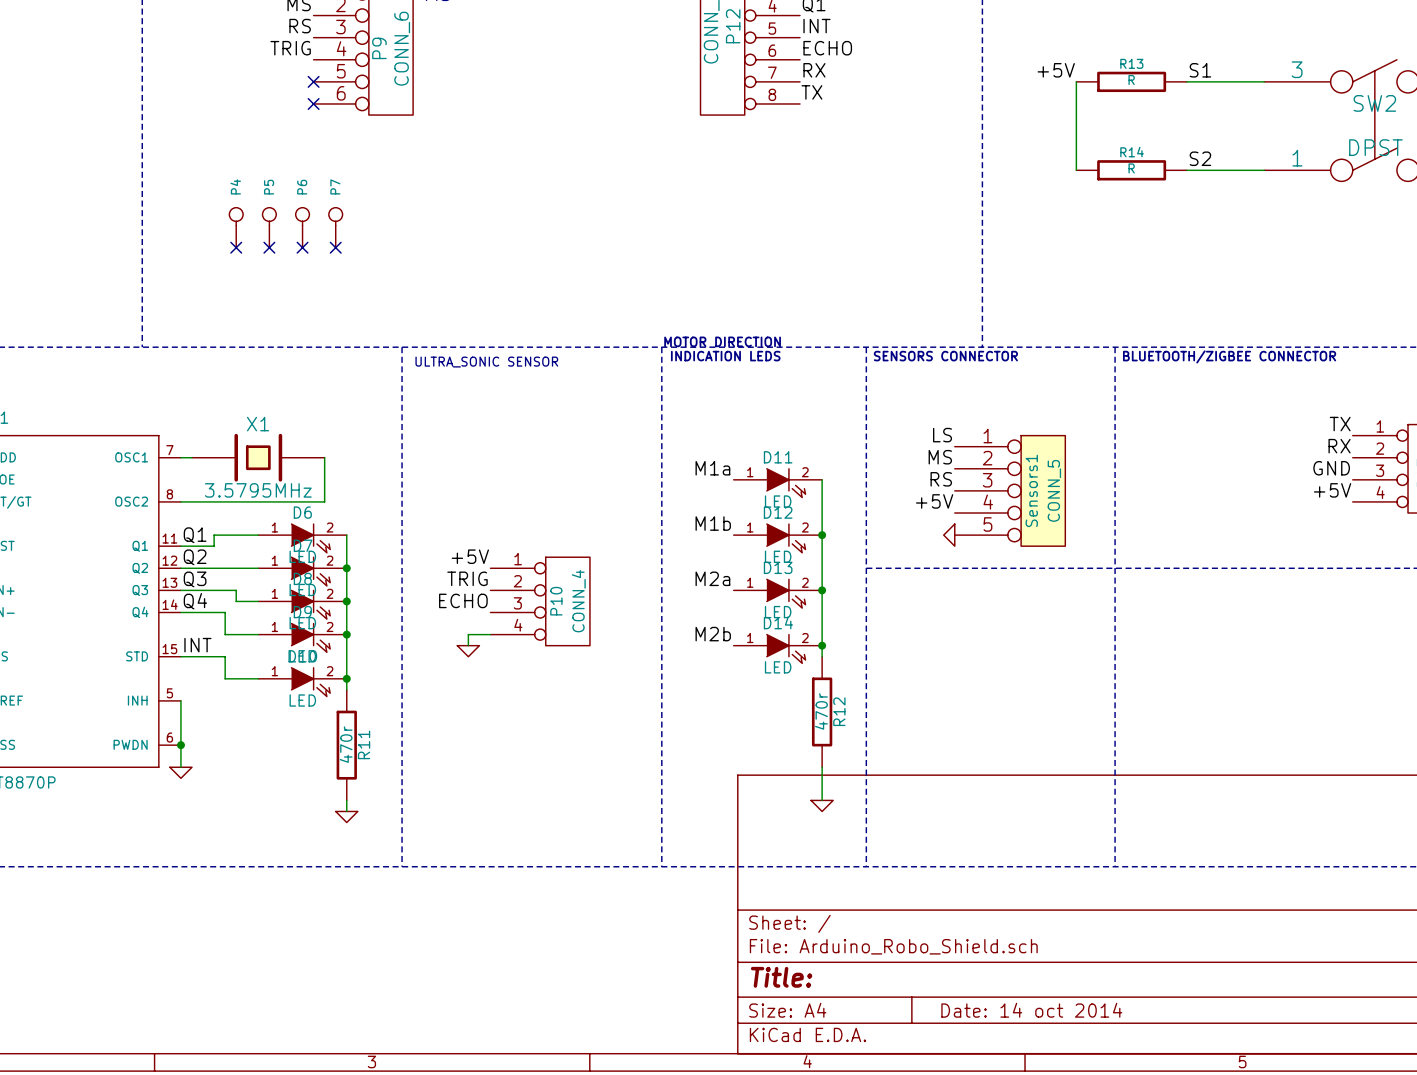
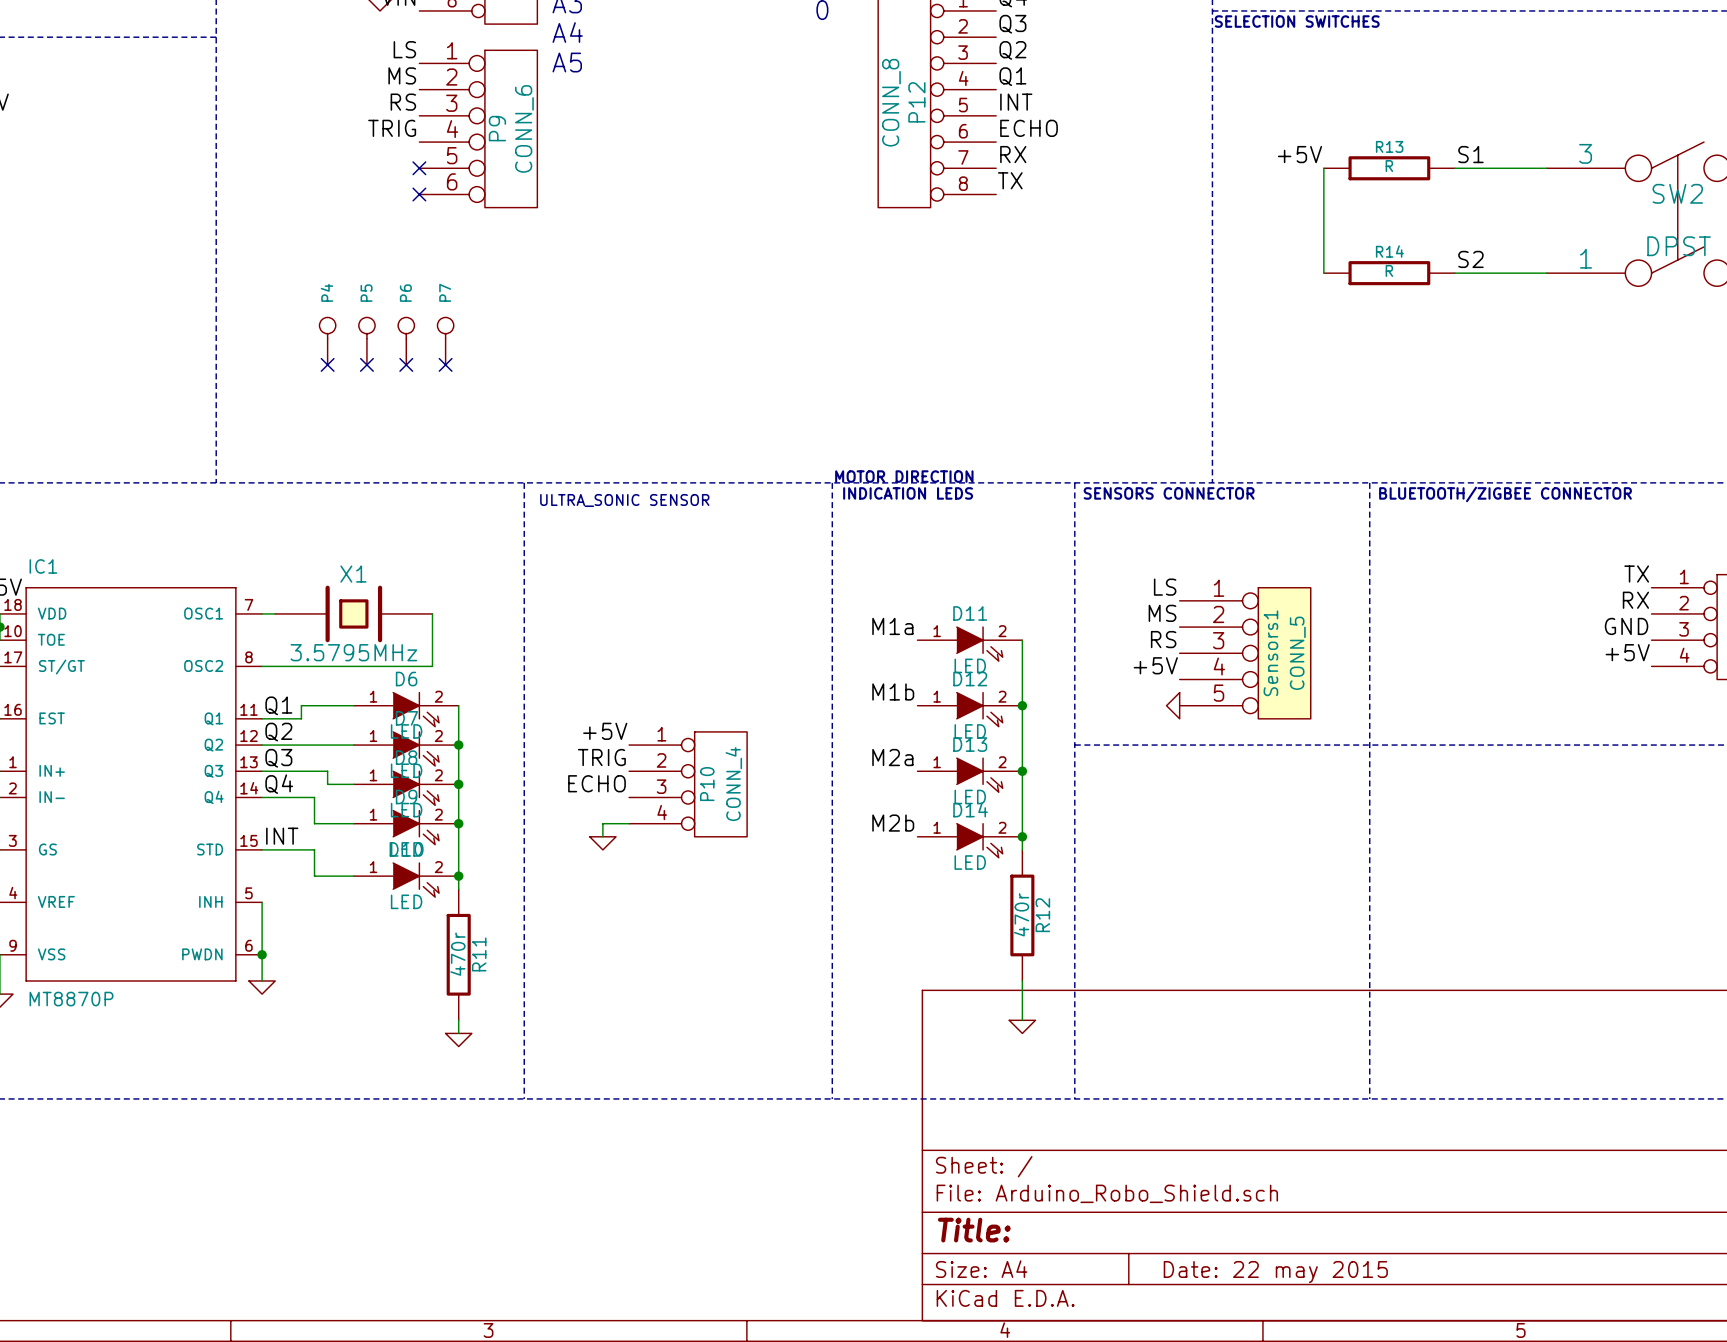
title block: Date: 14 oct 2014 (1031, 1010) -> Date: 22 may 2015 (1275, 1272)

